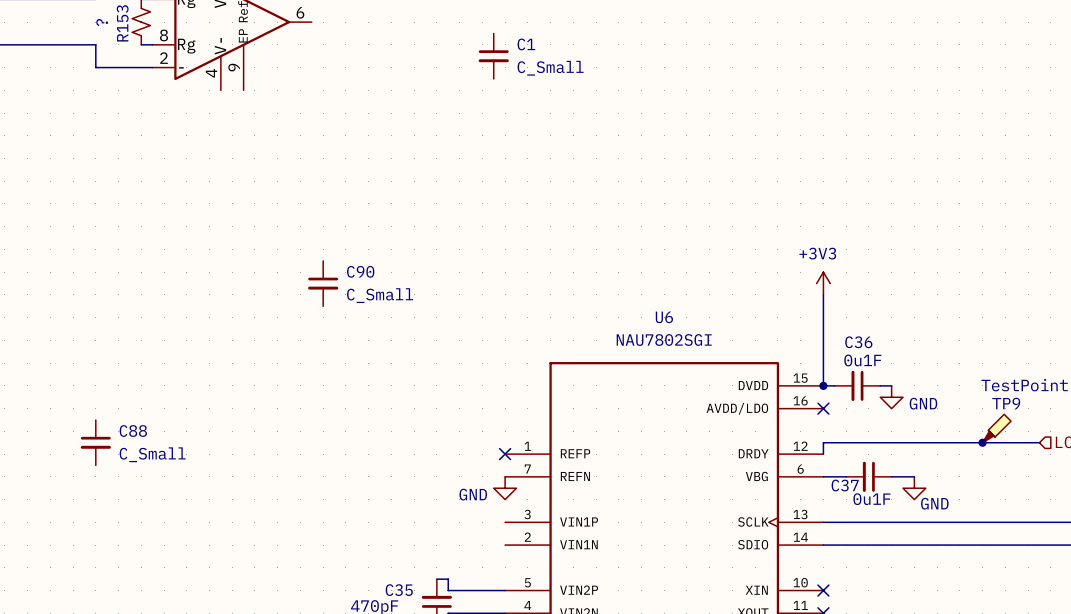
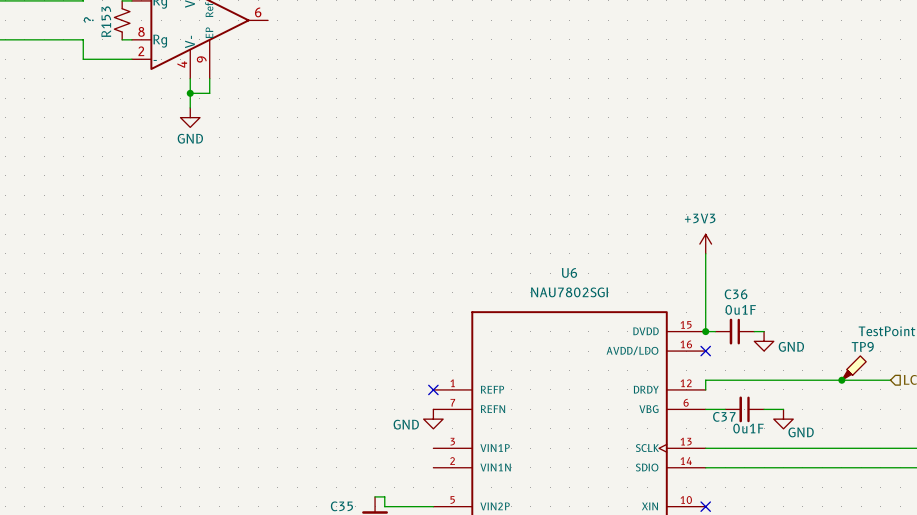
C1: C_Small (493, 56) -> none
wire: none -> (190, 78) (190, 107)
wire: none -> (209, 78) (209, 93) (190, 93)
junction: none -> (190, 93)
power symbol: none -> GND (190, 117)
C90: C_Small (323, 283) -> none
C88: C_Small (95, 442) -> none

